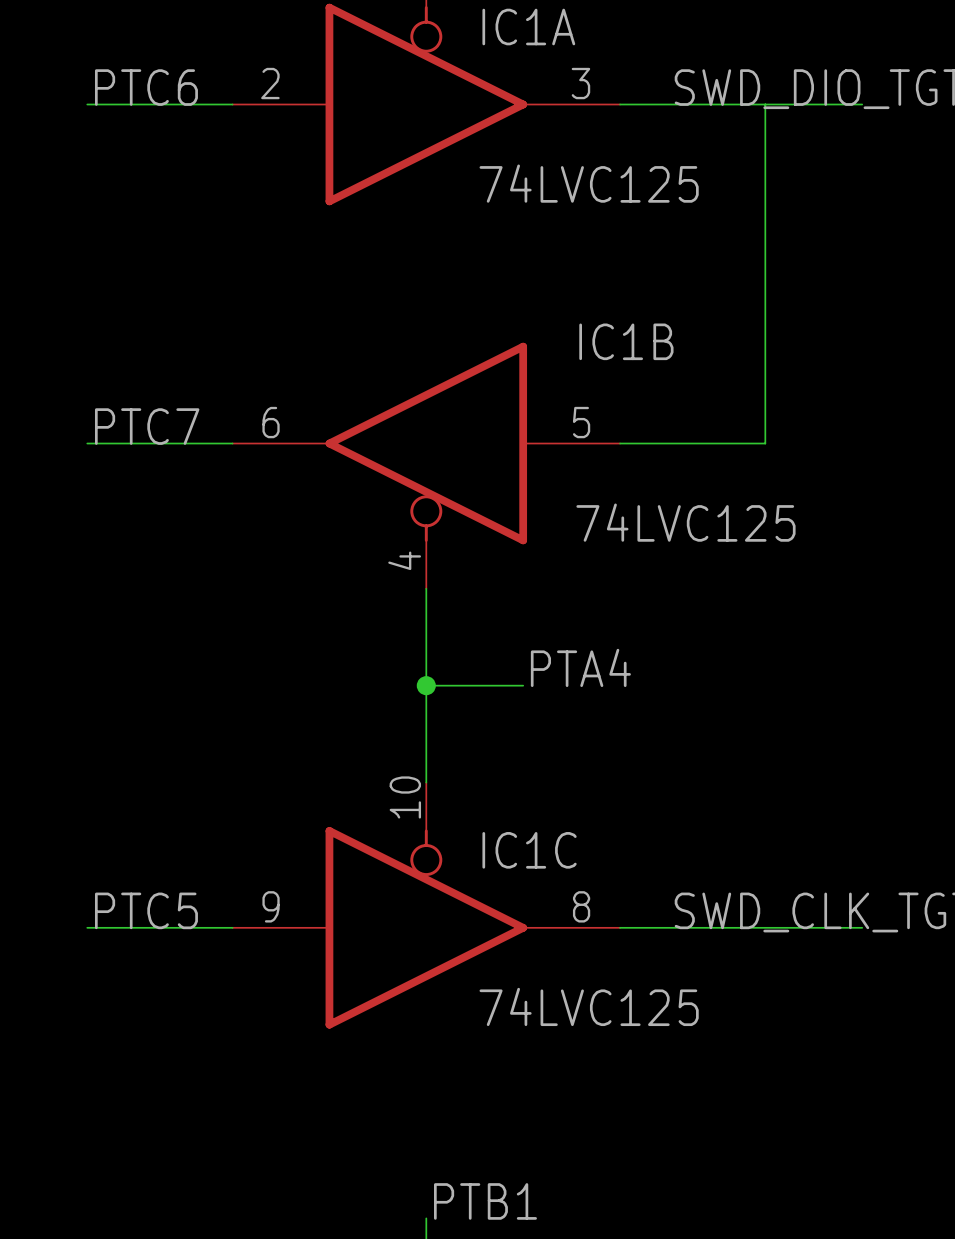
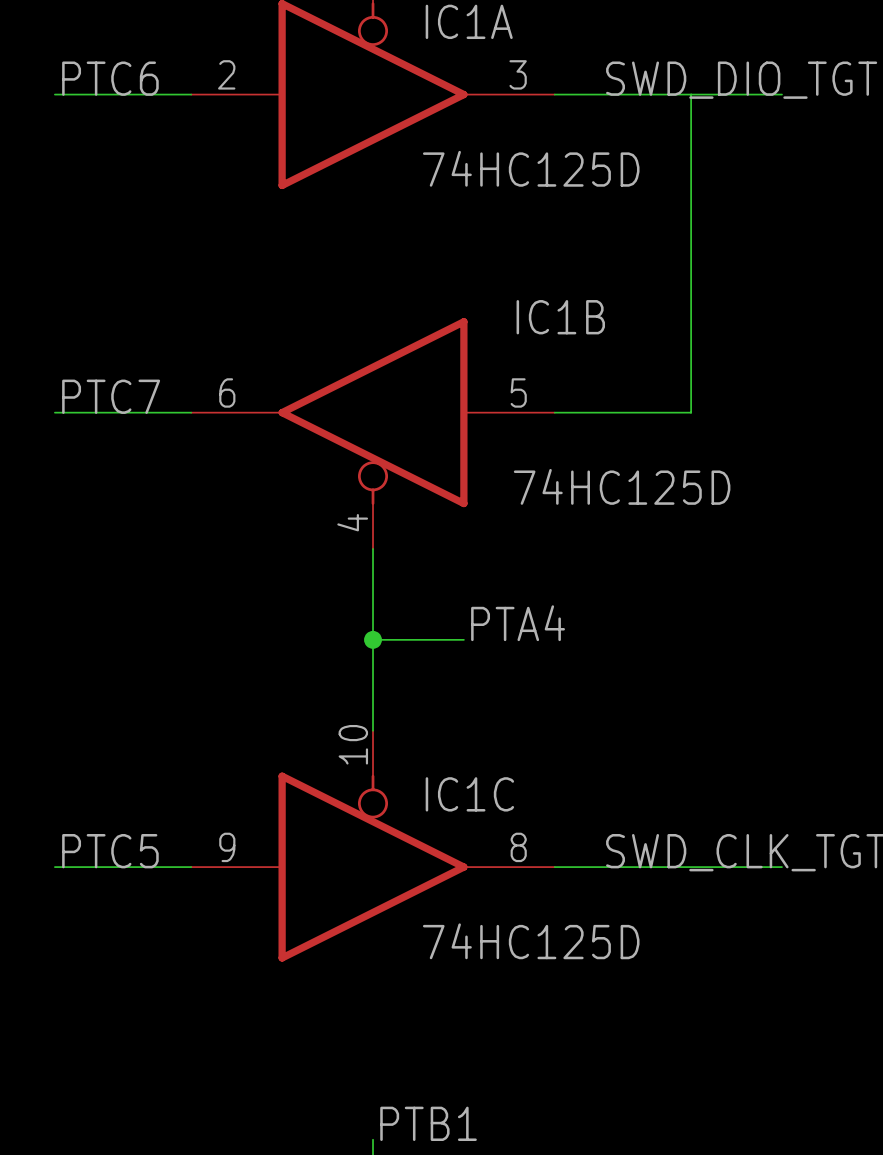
IC1A value: 74LVC125 (589, 183) -> 74HC125D (531, 168)
IC1B value: 74LVC125 (685, 522) -> 74HC125D (622, 486)
IC1C value: 74LVC125 (589, 1006) -> 74HC125D (531, 941)

